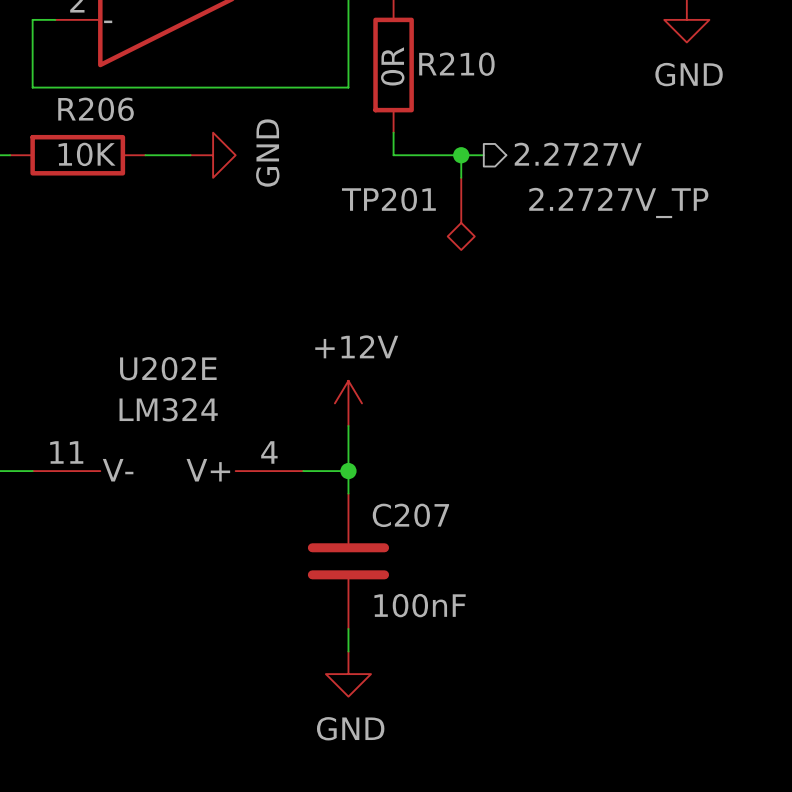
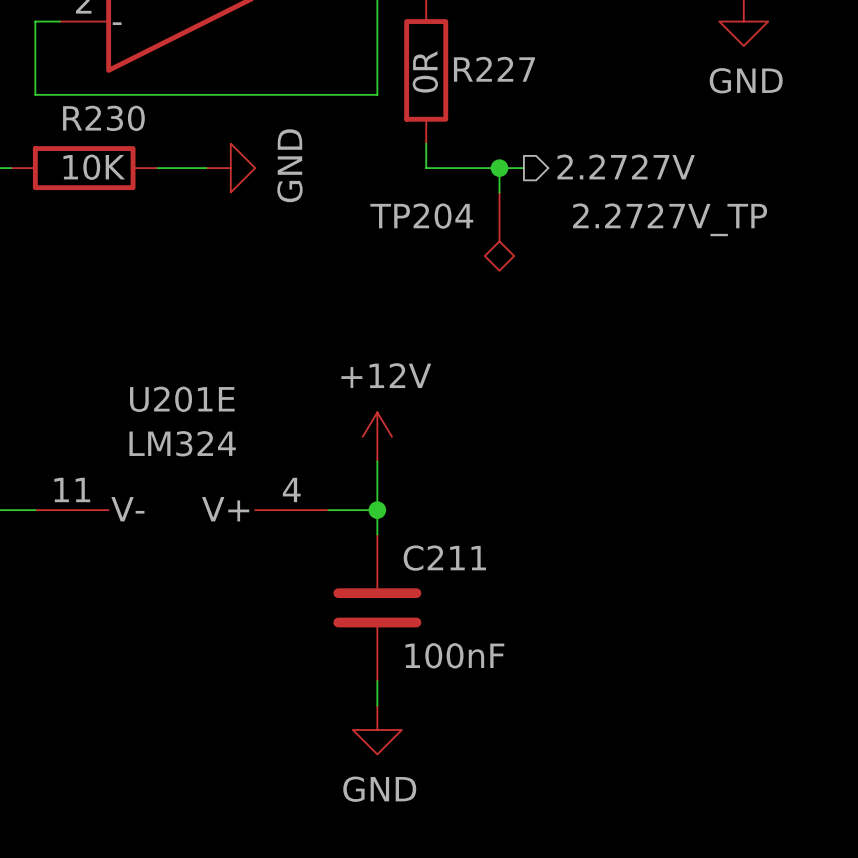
R210 name: R210 (456, 64) -> R227 (494, 69)
R206 name: R206 (96, 109) -> R230 (103, 118)
TP201 name: TP201 (388, 199) -> TP204 (421, 216)
U202E name: U202E (168, 368) -> U201E (182, 399)
C207 name: C207 (410, 515) -> C211 (444, 558)

